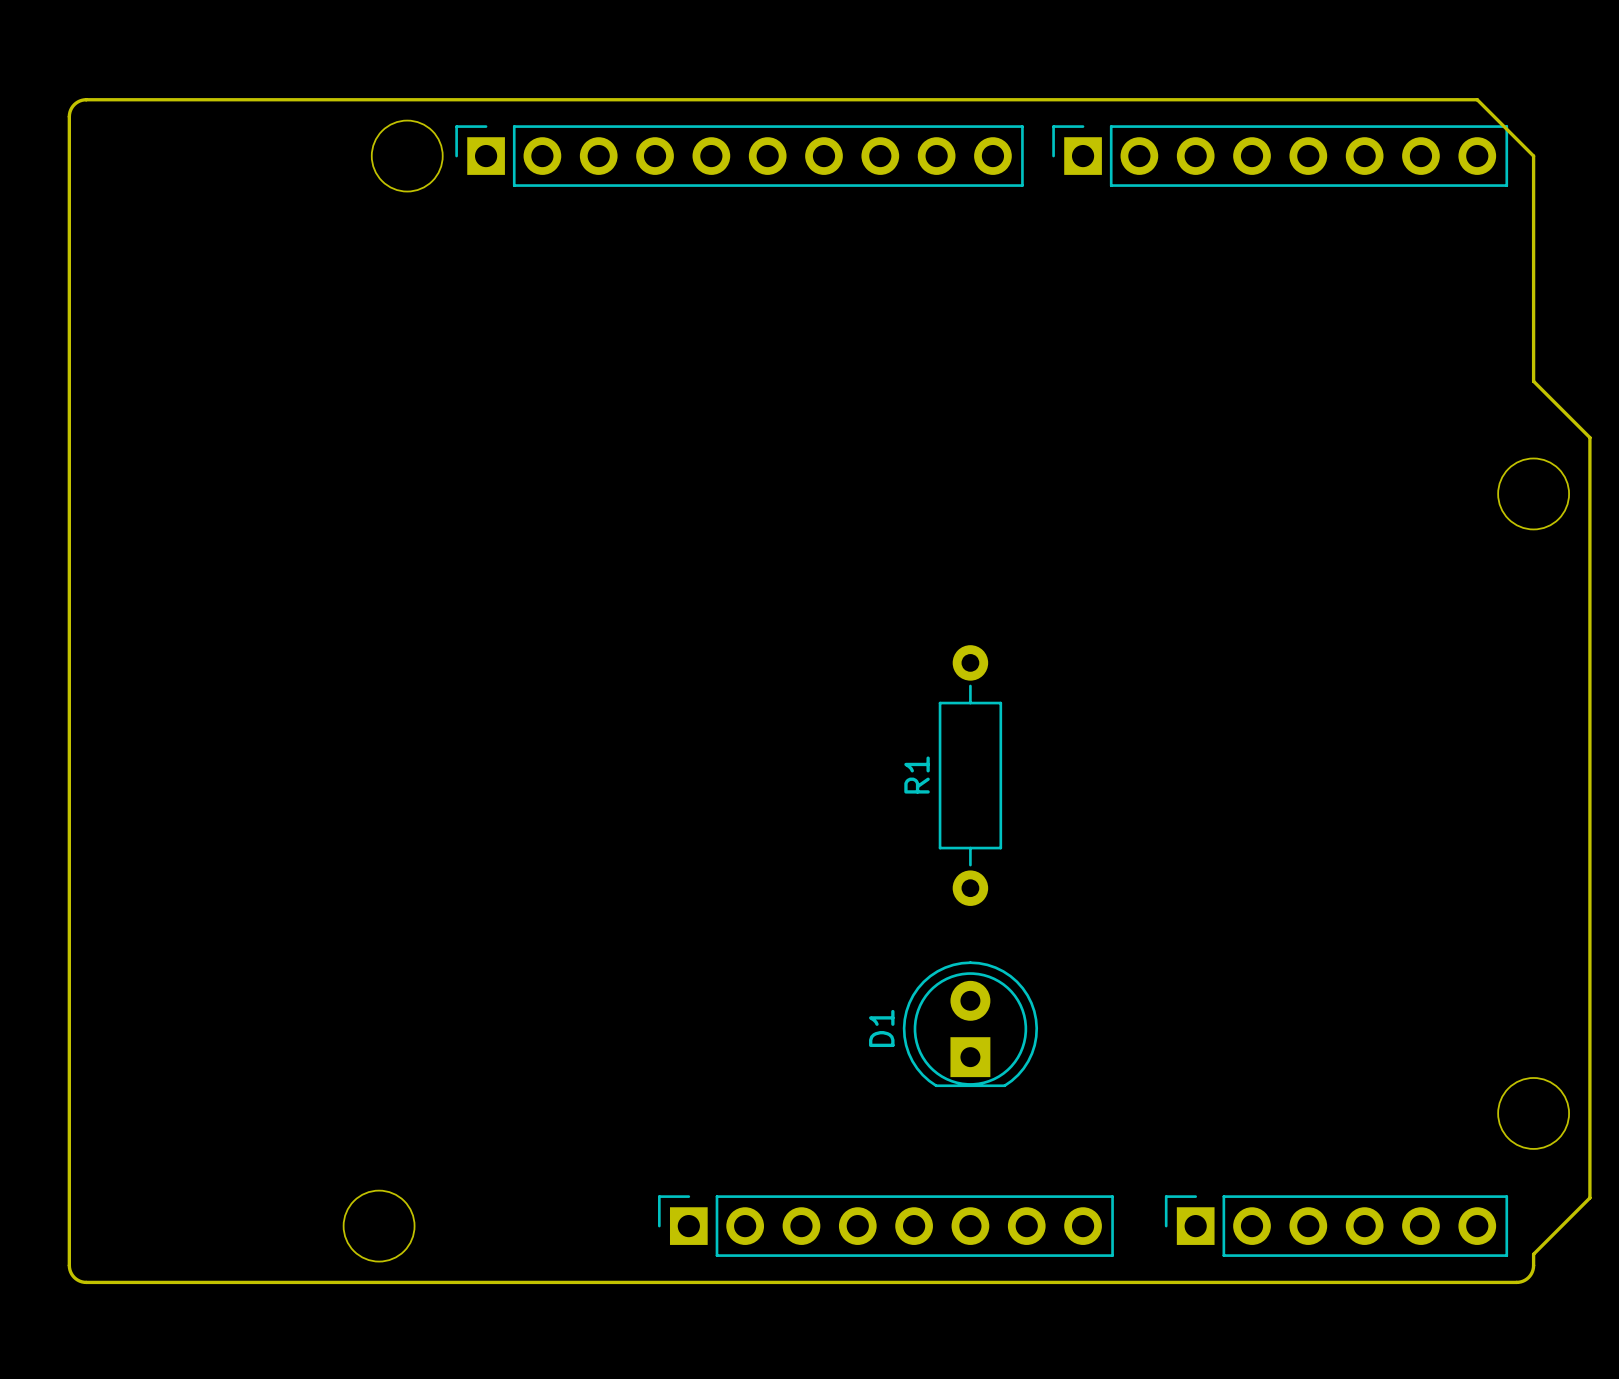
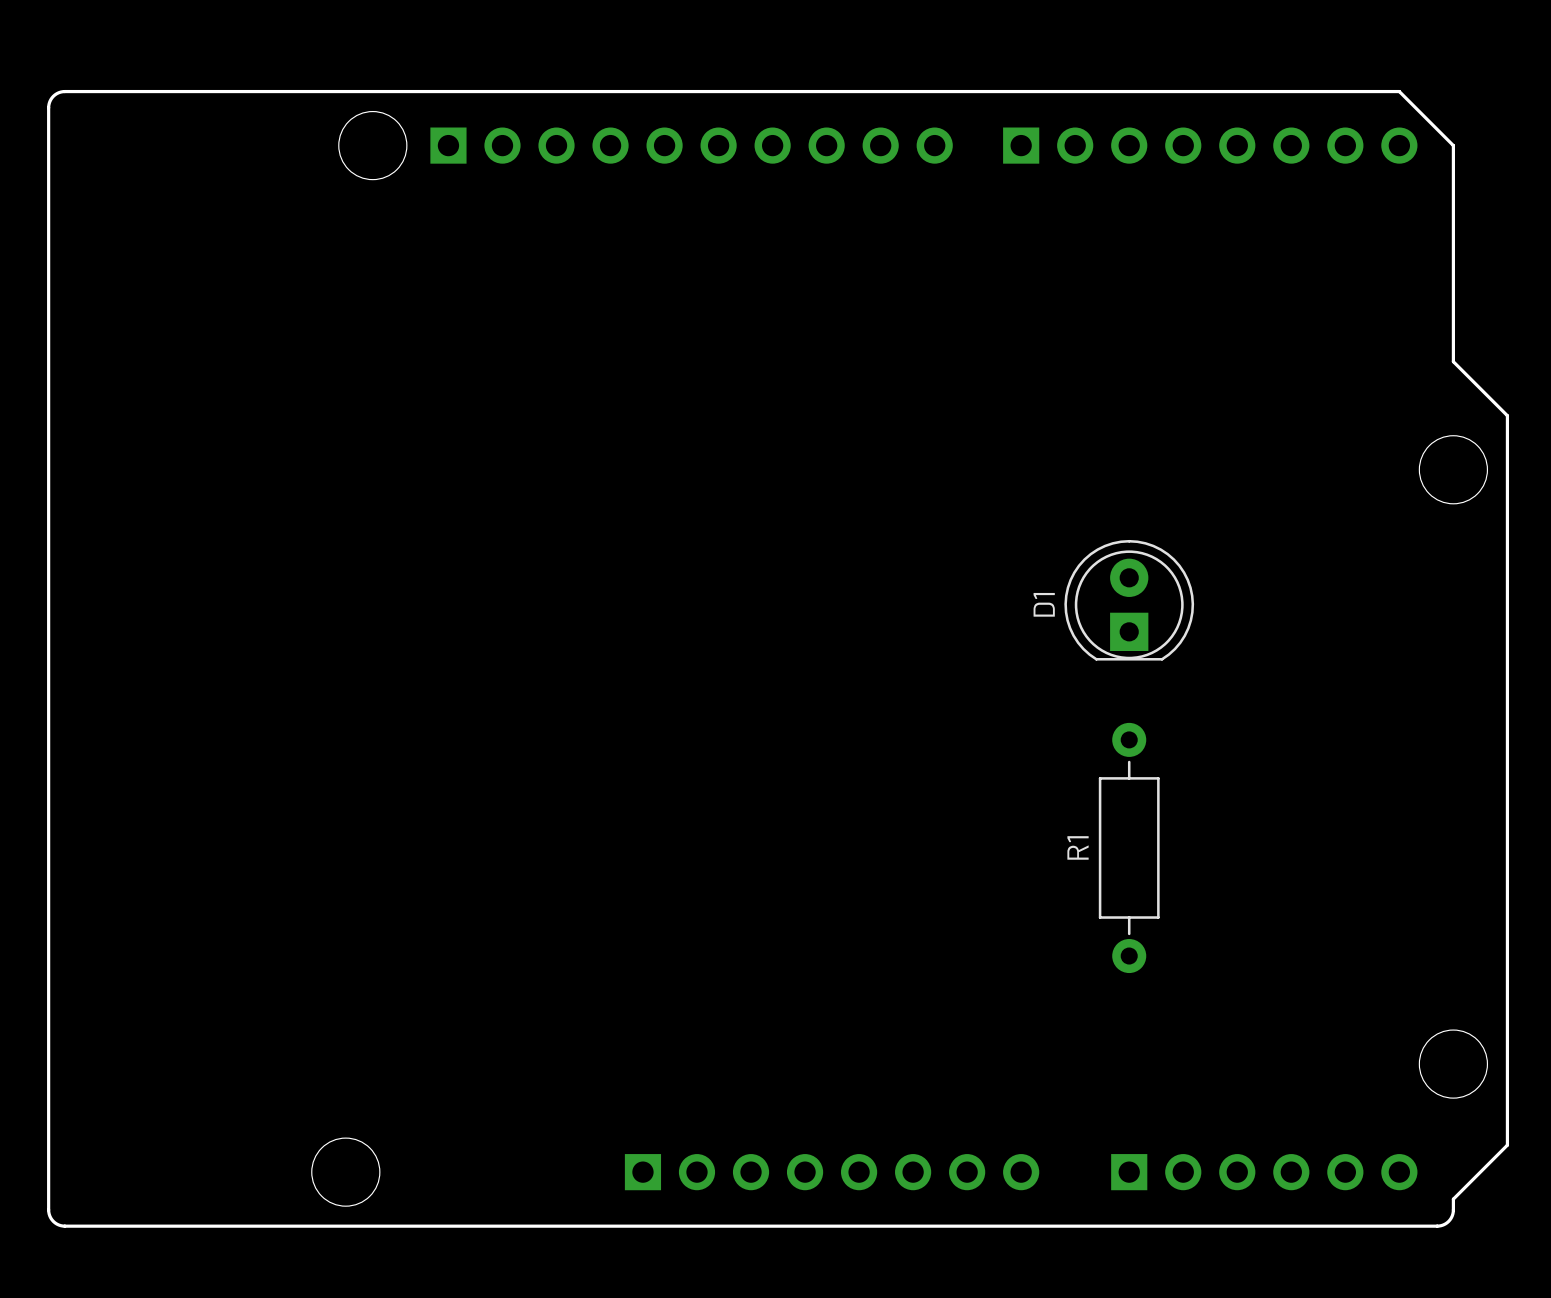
part side: top (739, 156) -> bottom (691, 145)
part side: top (1280, 156) -> bottom (1210, 145)
R1 position: (970, 775) -> (1129, 847)
D1 position: (970, 1024) -> (1129, 600)
part side: top (885, 1226) -> bottom (832, 1172)
part side: top (1336, 1226) -> bottom (1264, 1172)

